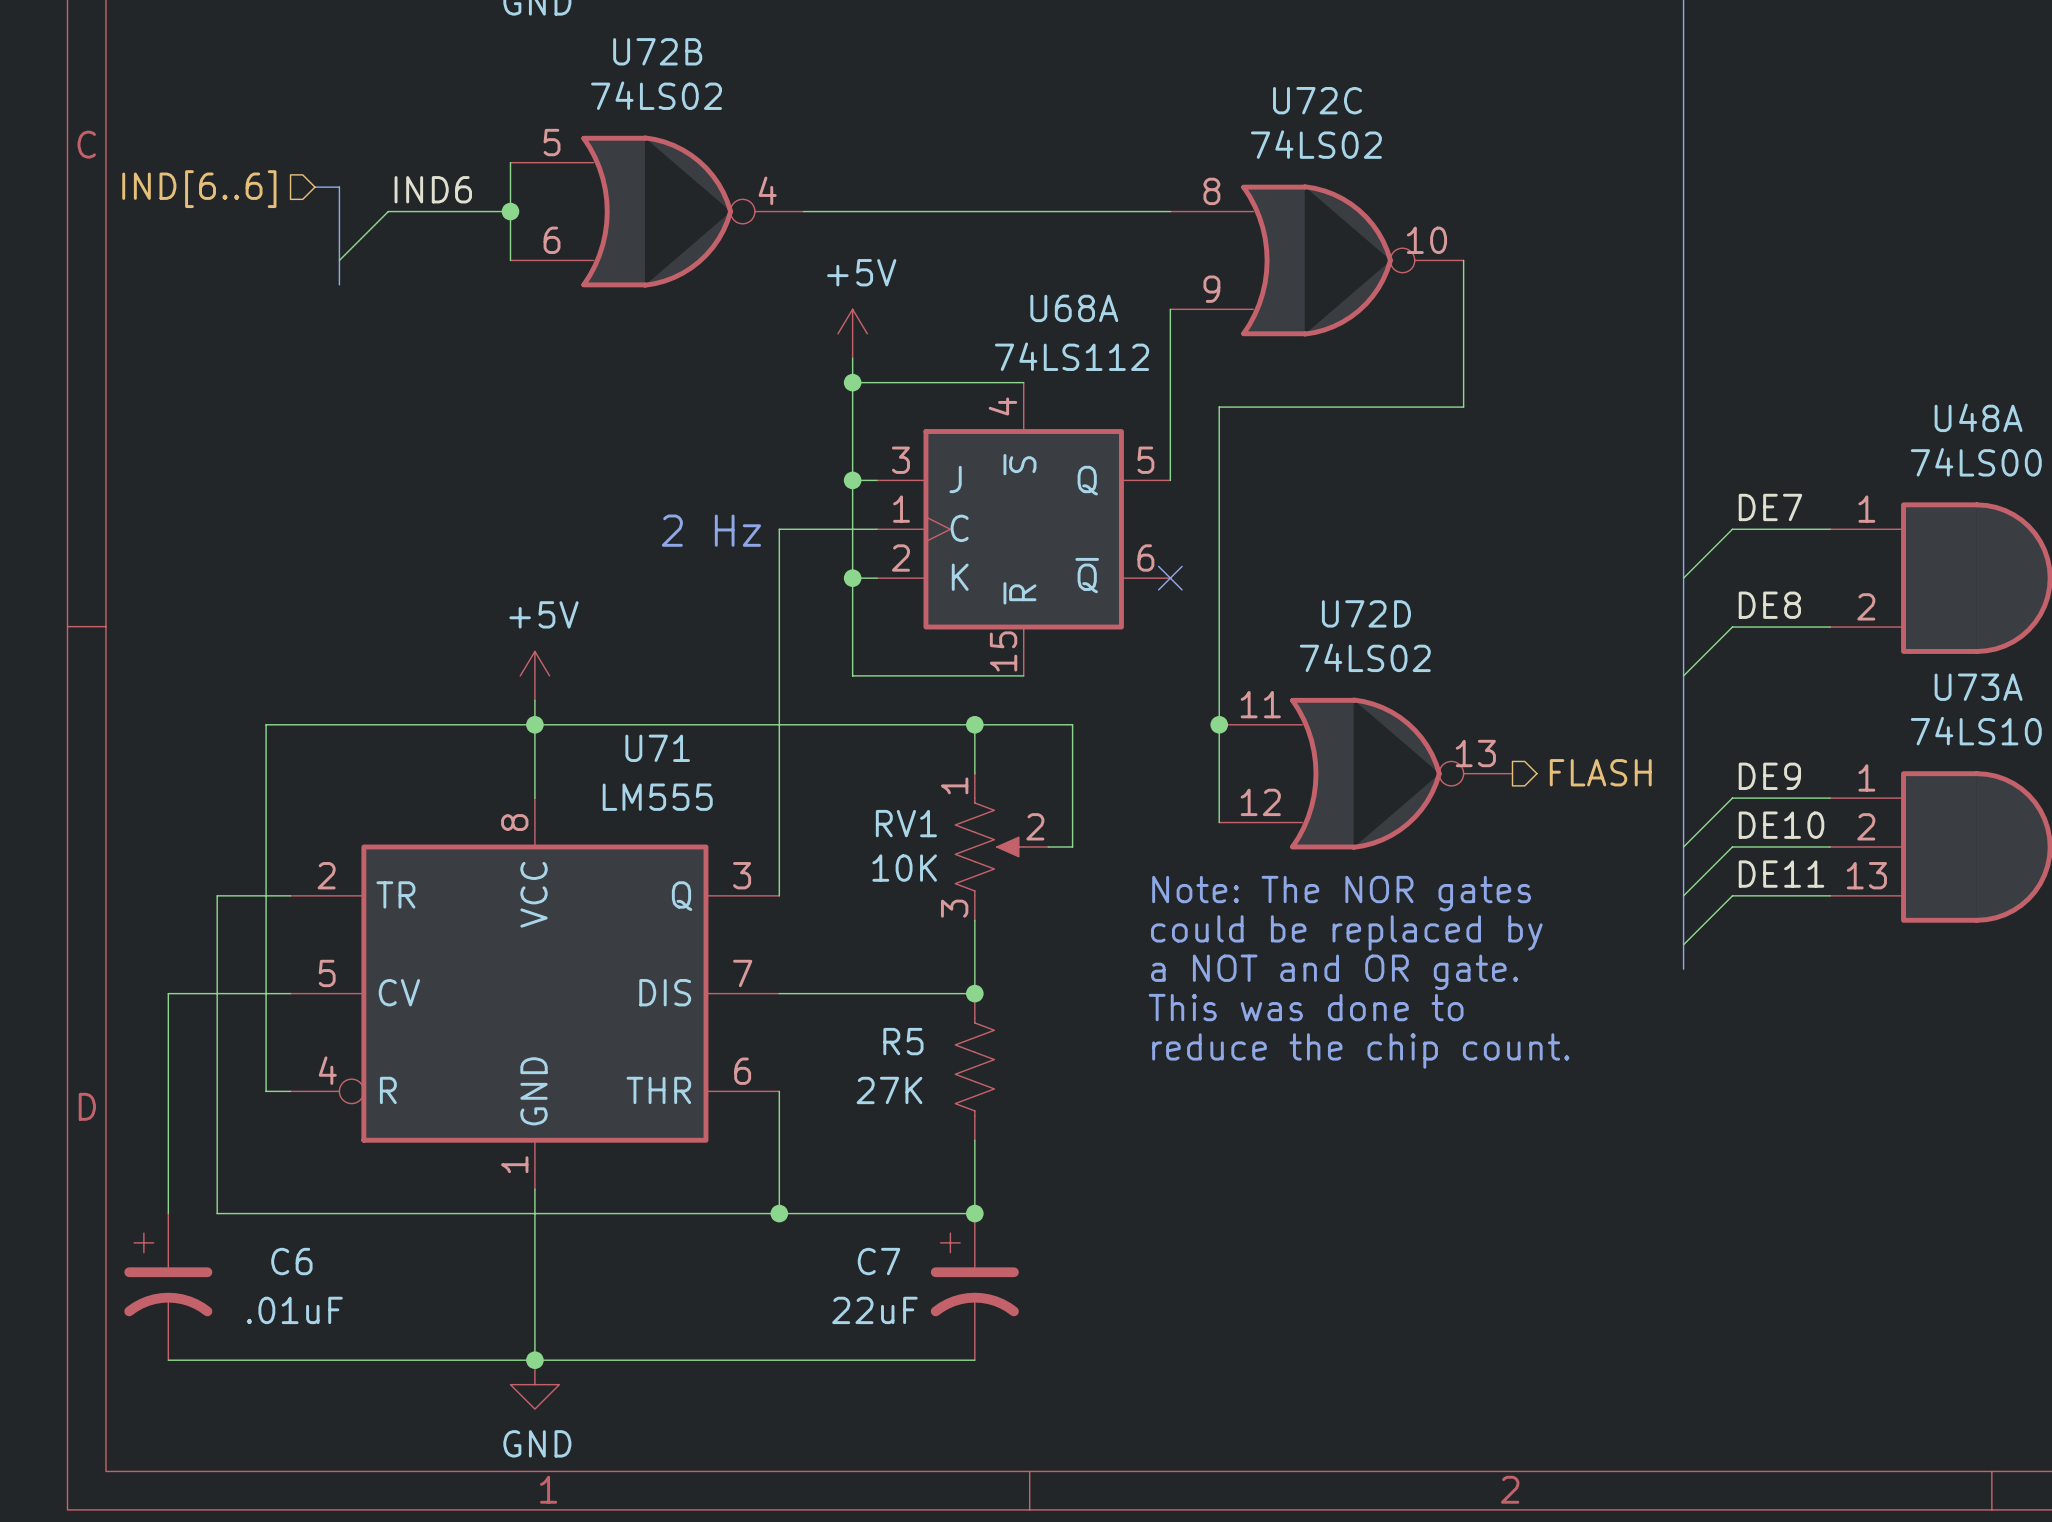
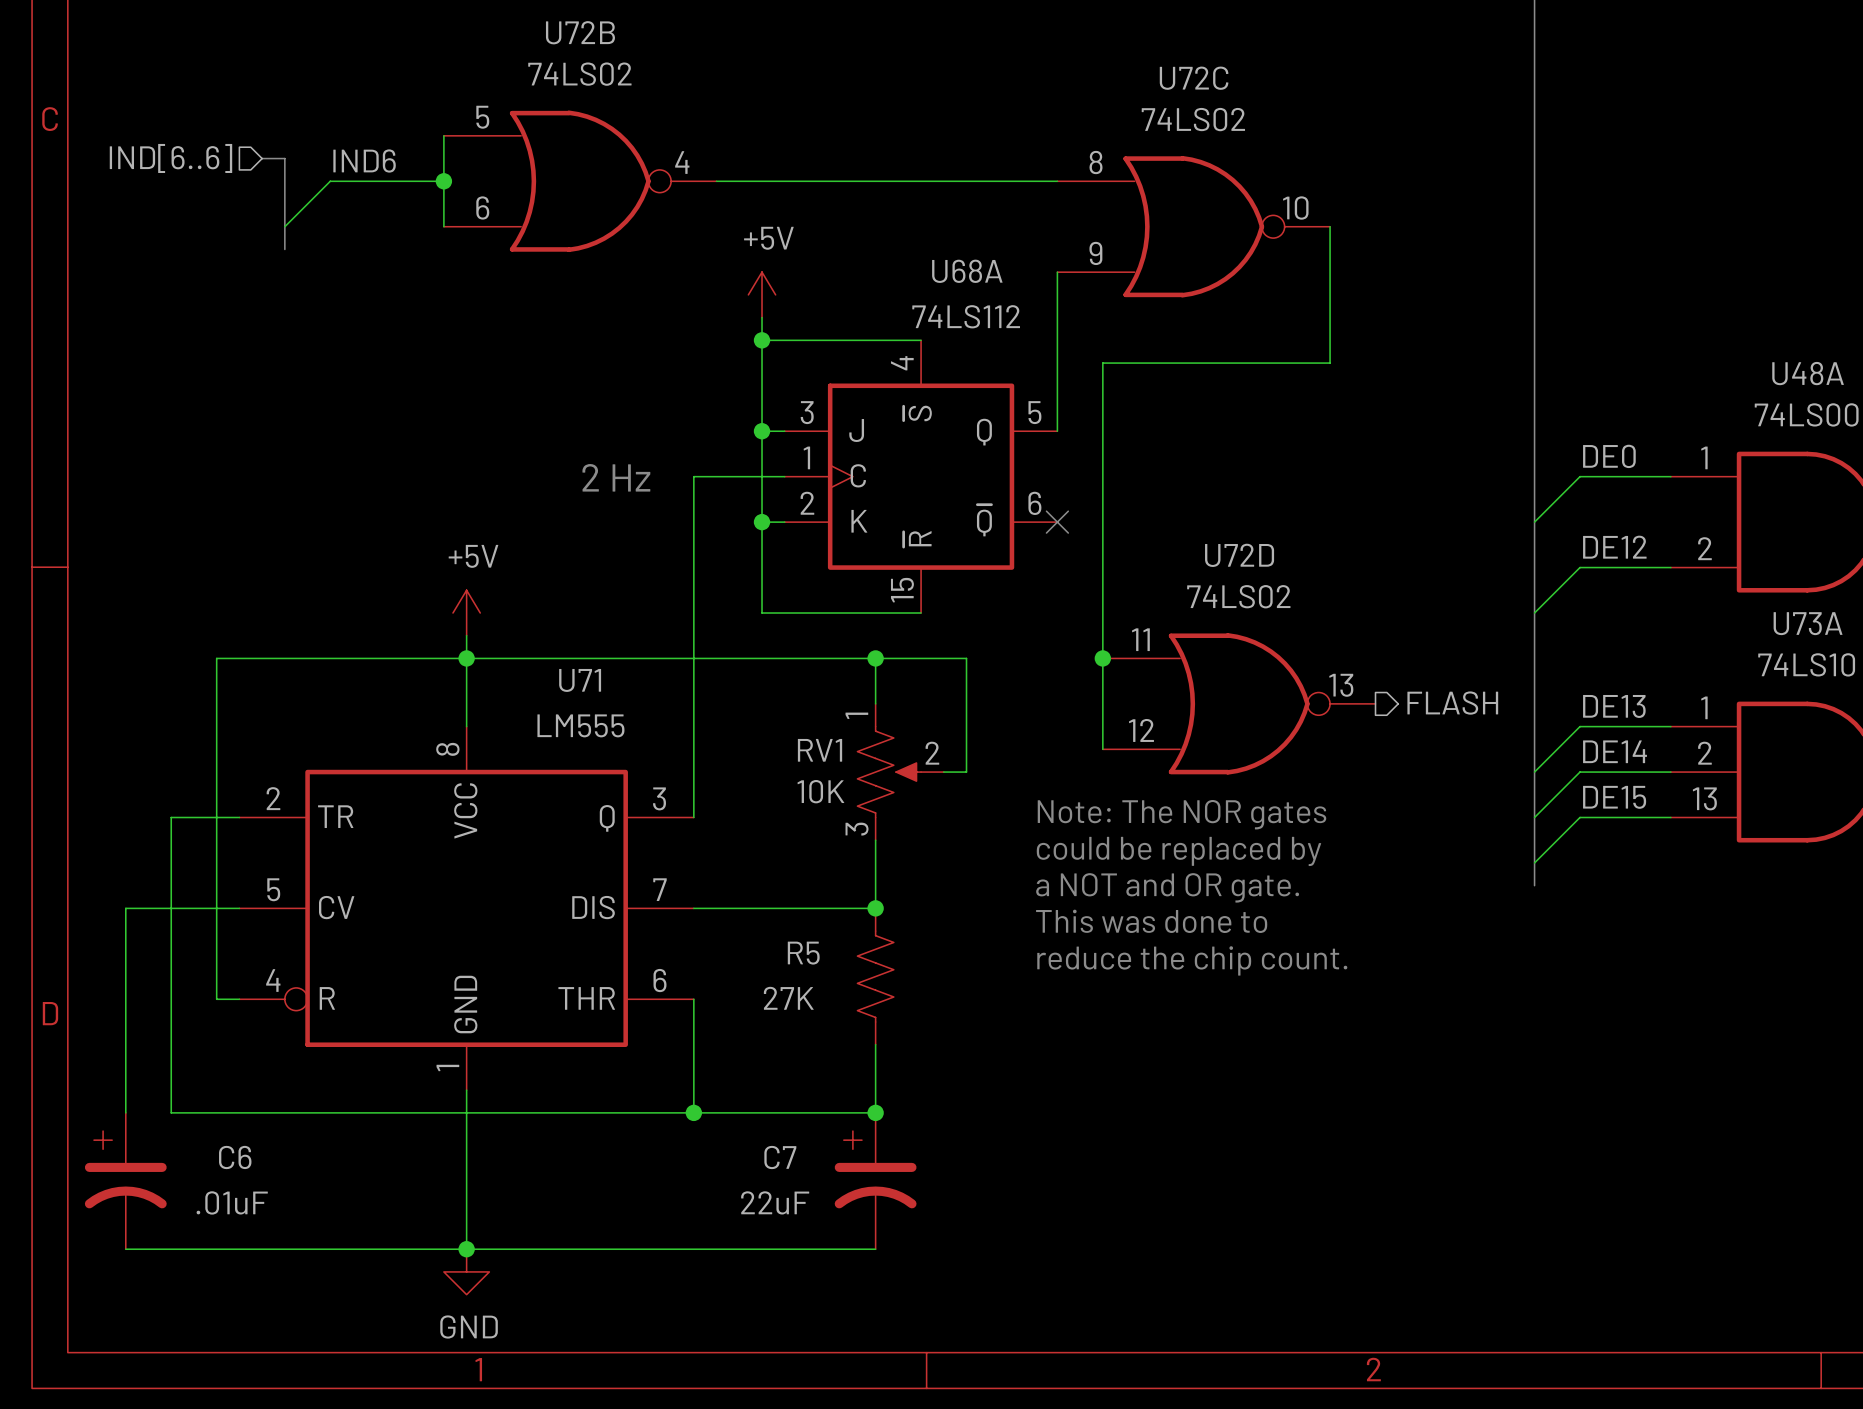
label: DE7 (1770, 507) -> DE0 (1609, 456)
label: DE8 (1769, 605) -> DE12 (1614, 547)
label: DE9 (1769, 776) -> DE13 (1614, 706)
label: DE10 (1781, 825) -> DE14 (1615, 751)
label: DE11 (1781, 874) -> DE15 (1614, 797)

